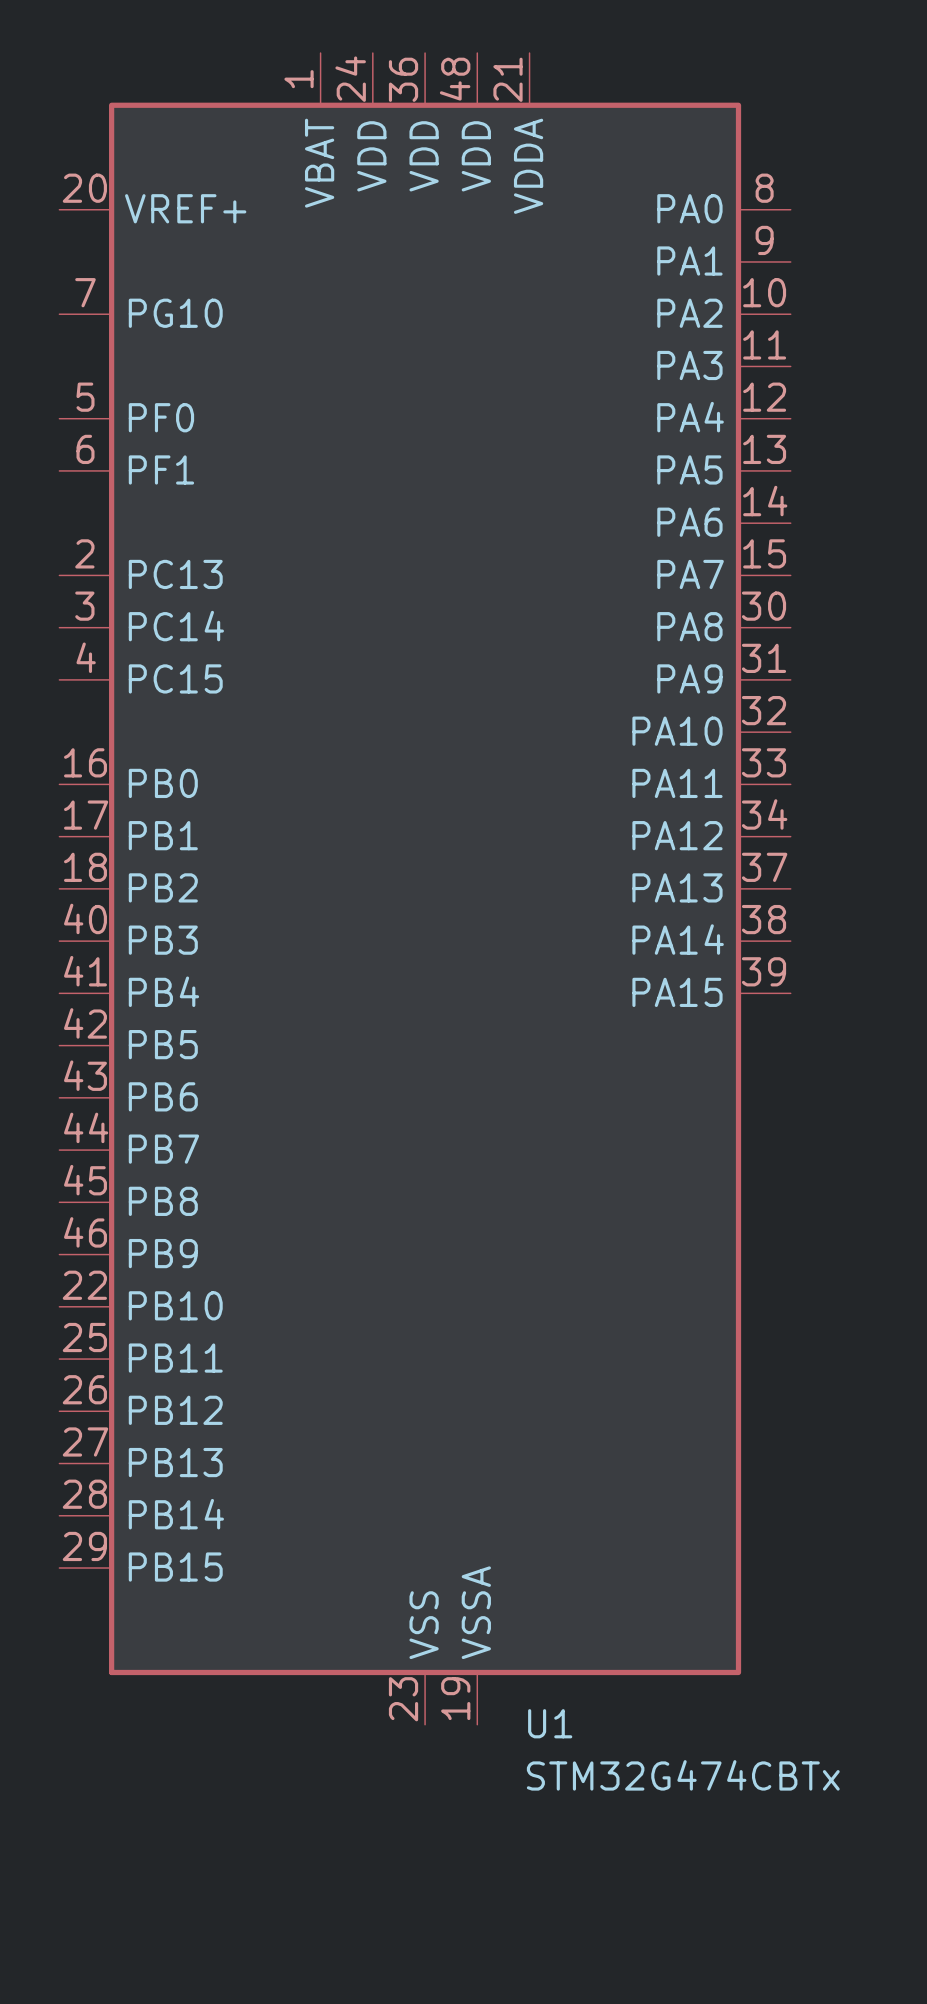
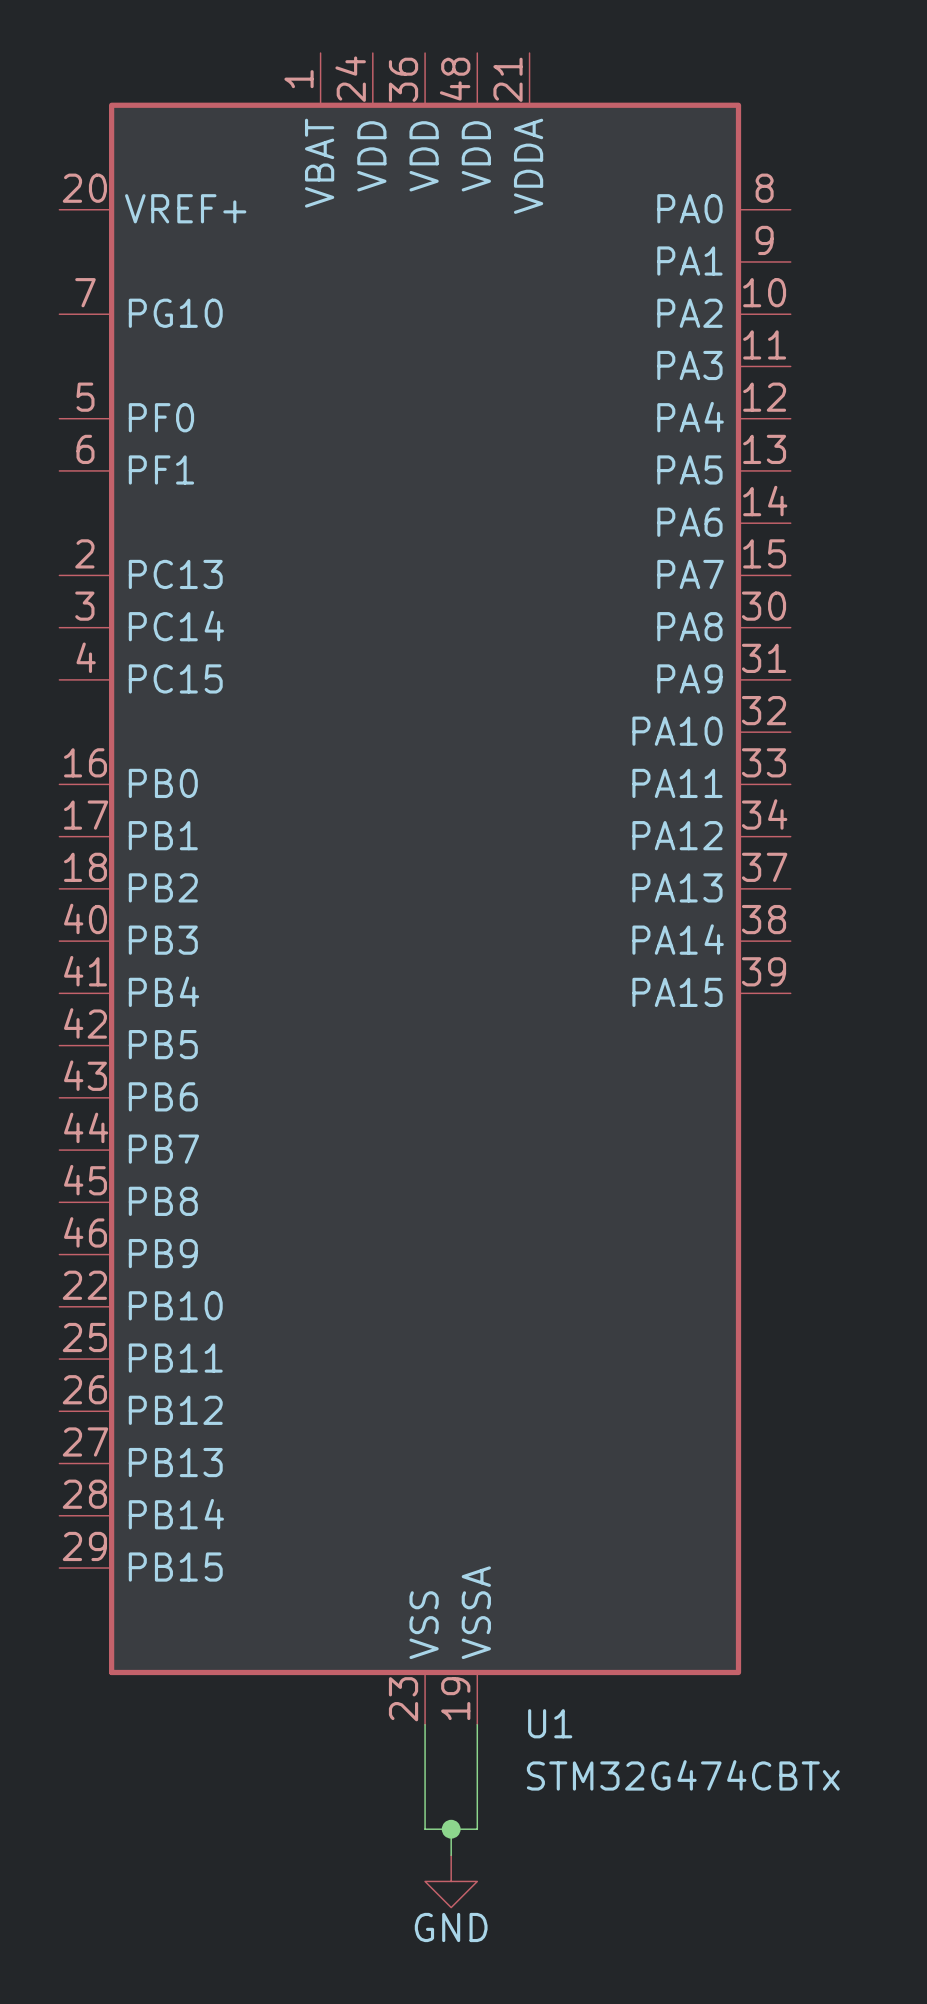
wire: none -> (425, 1724) (425, 1829) (477, 1829) (477, 1724)
wire: none -> (451, 1829) (451, 1855)
junction: none -> (451, 1829)
power symbol: none -> GND (451, 1881)

